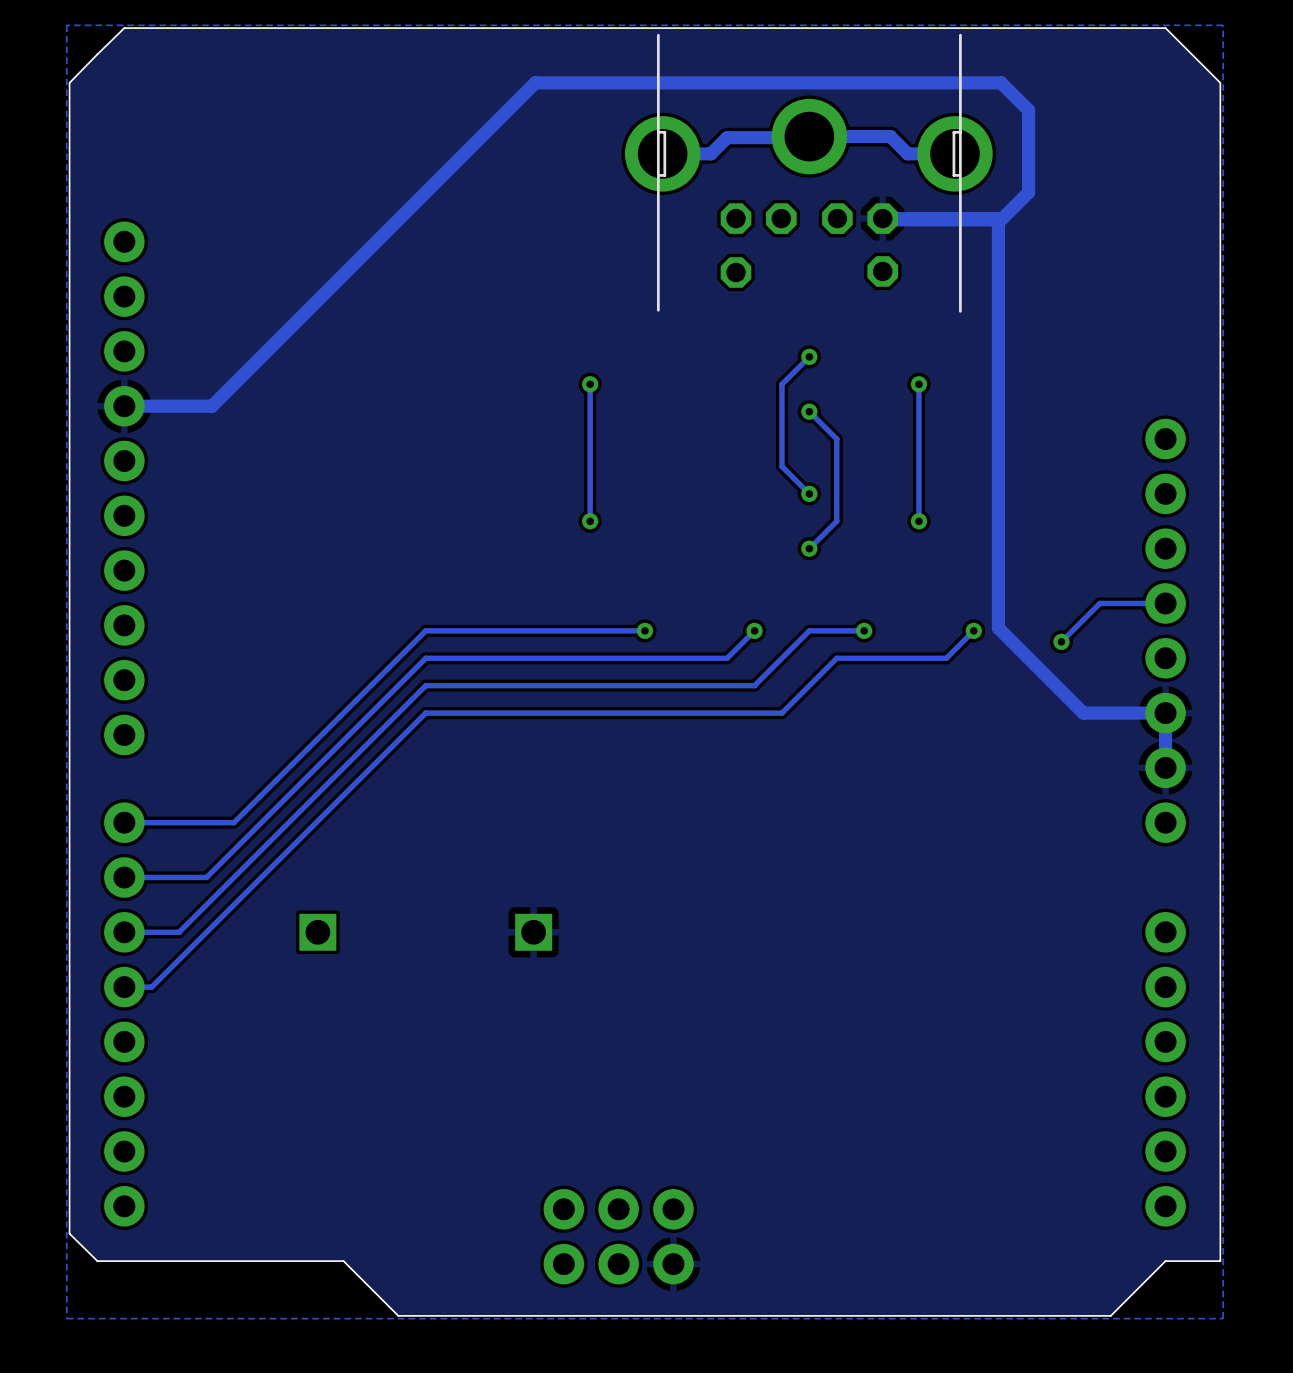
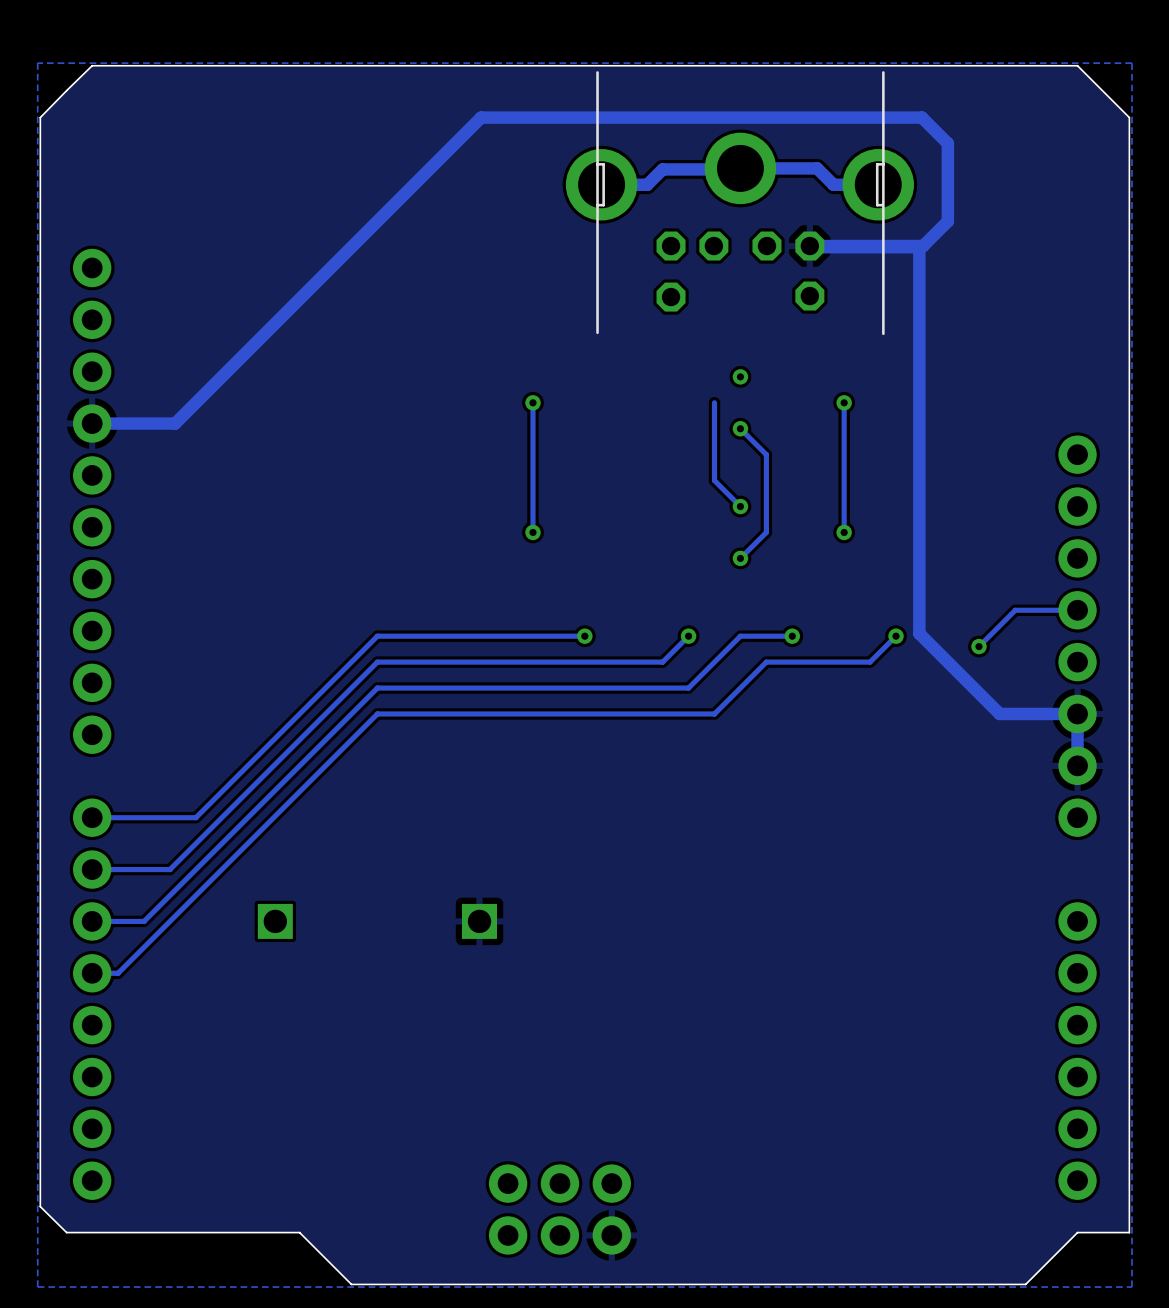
track: (809, 356) (781, 384) -> none

